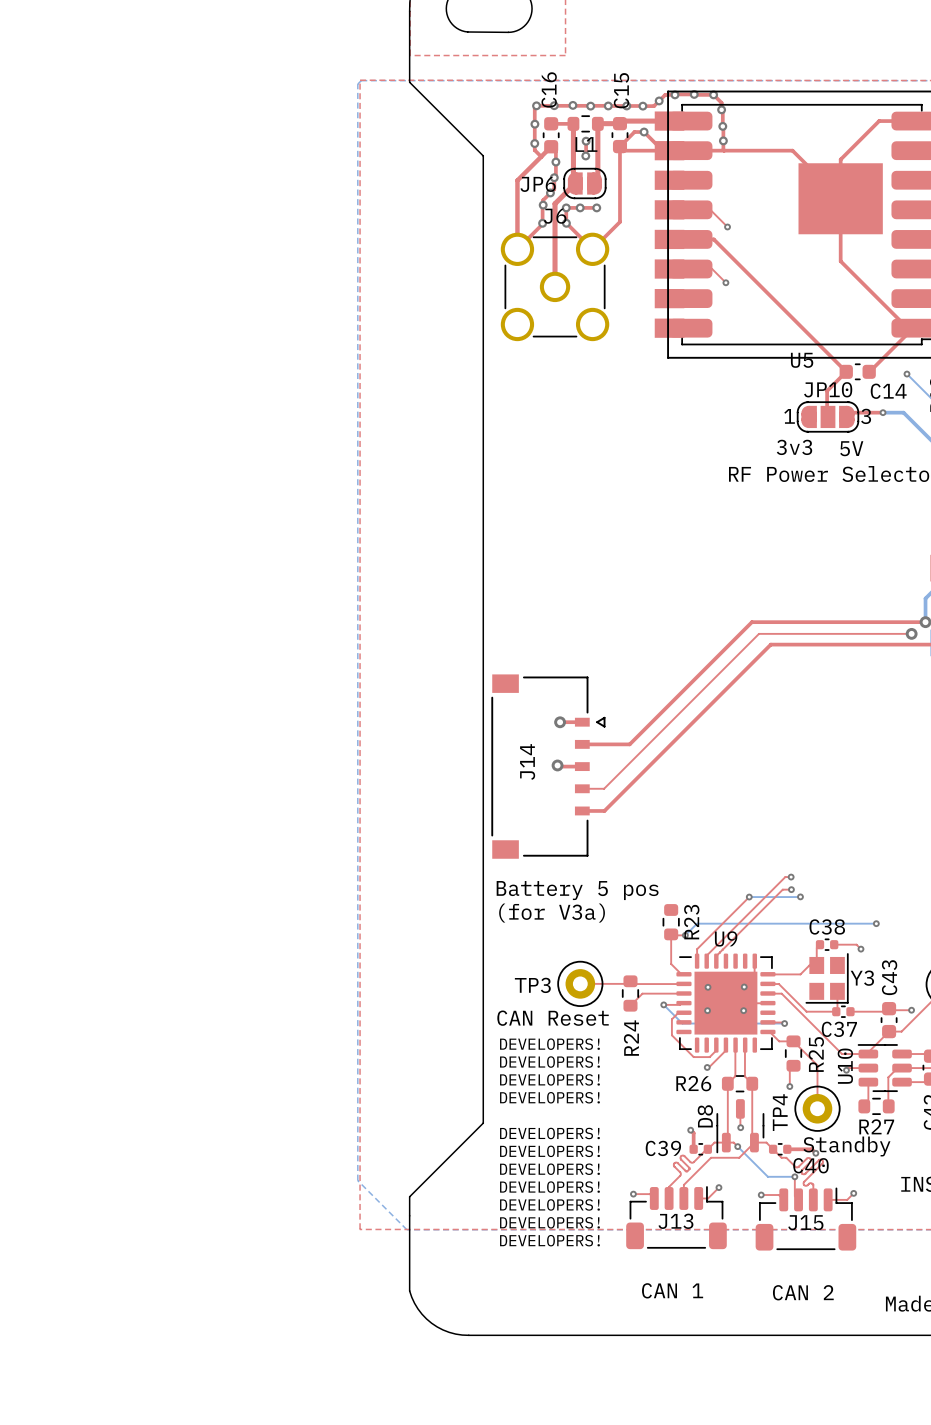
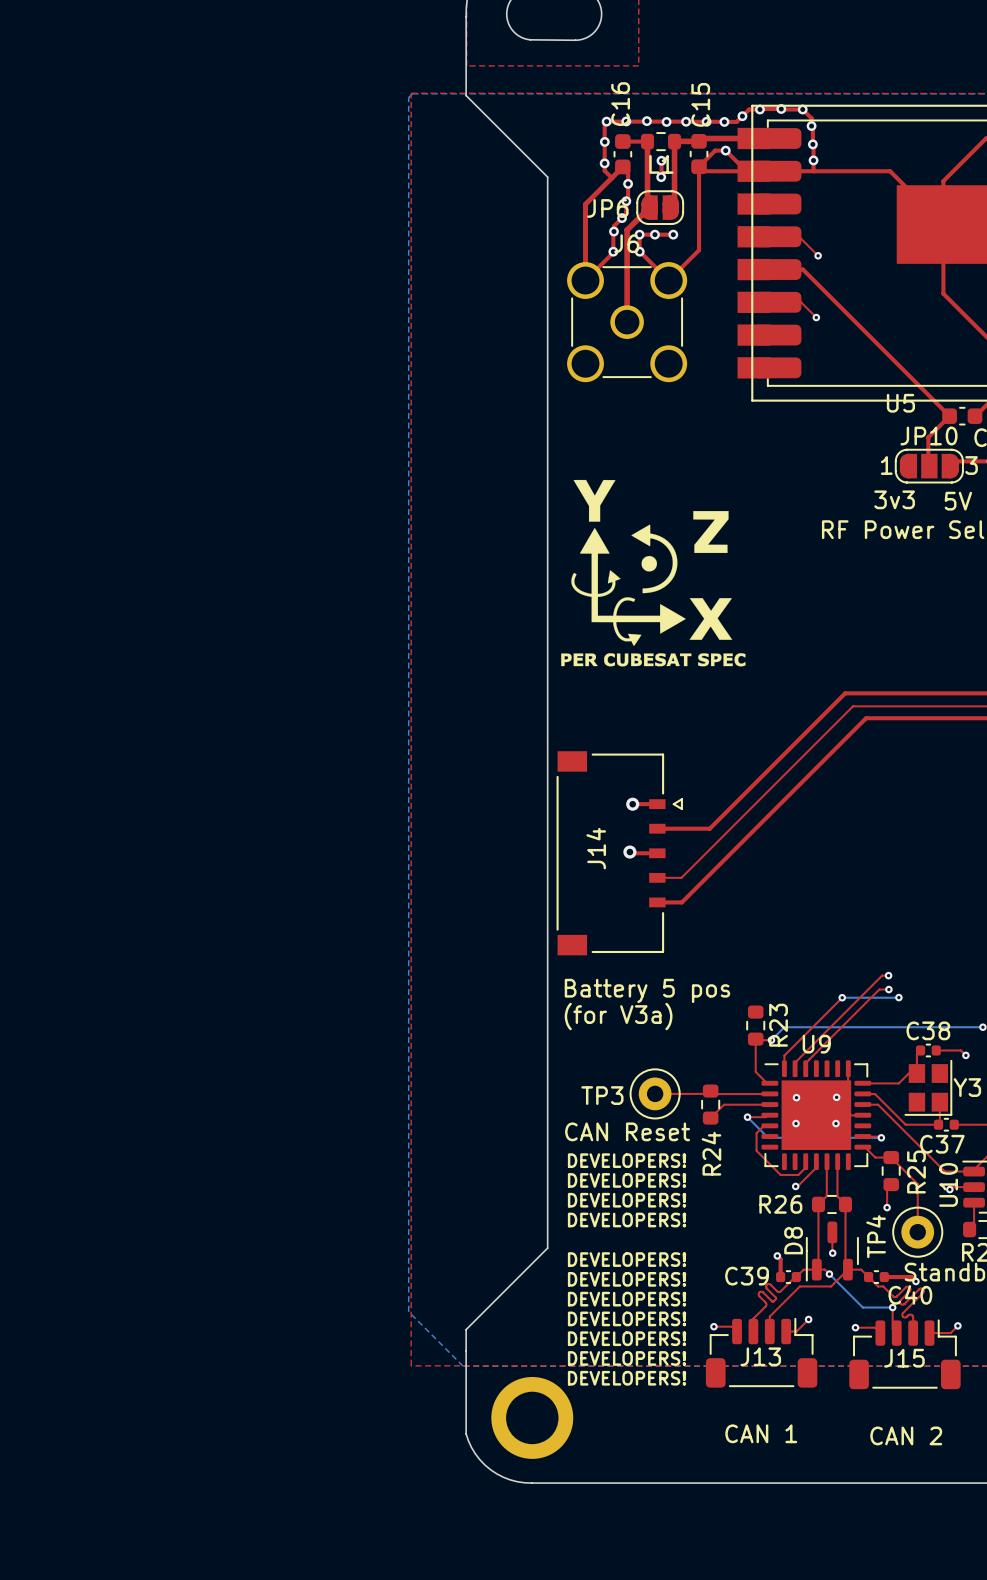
drawing: none -> [561, 479, 746, 667]
part: none -> (532, 1417)

